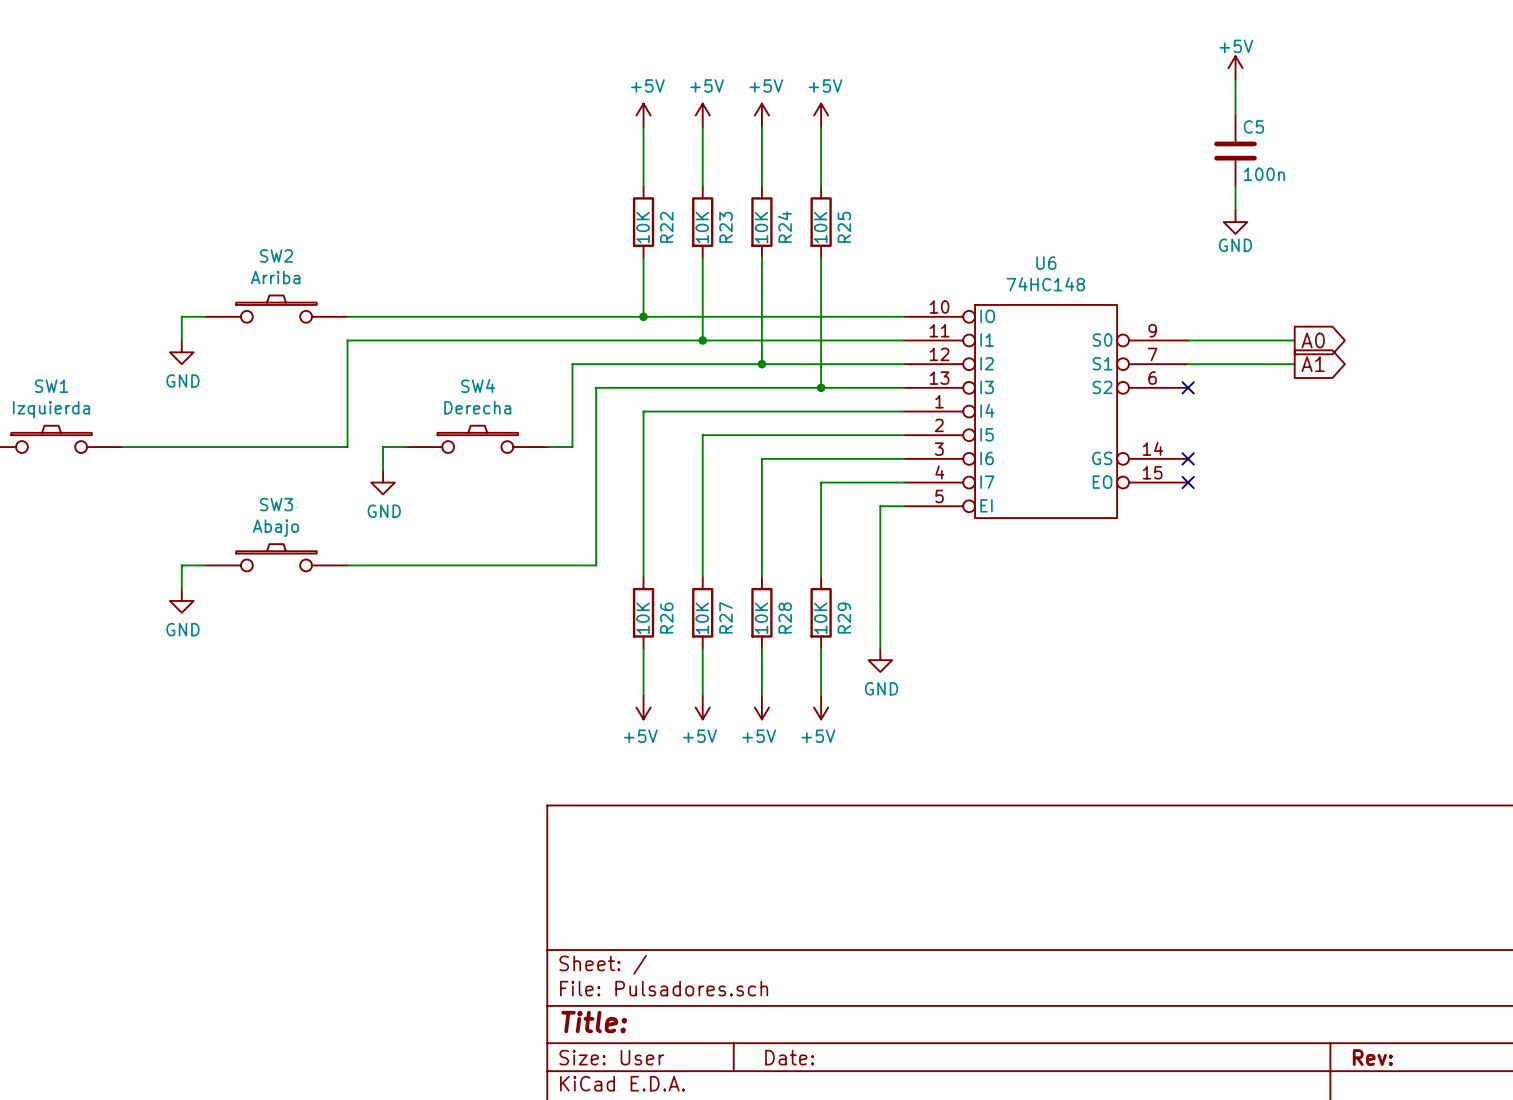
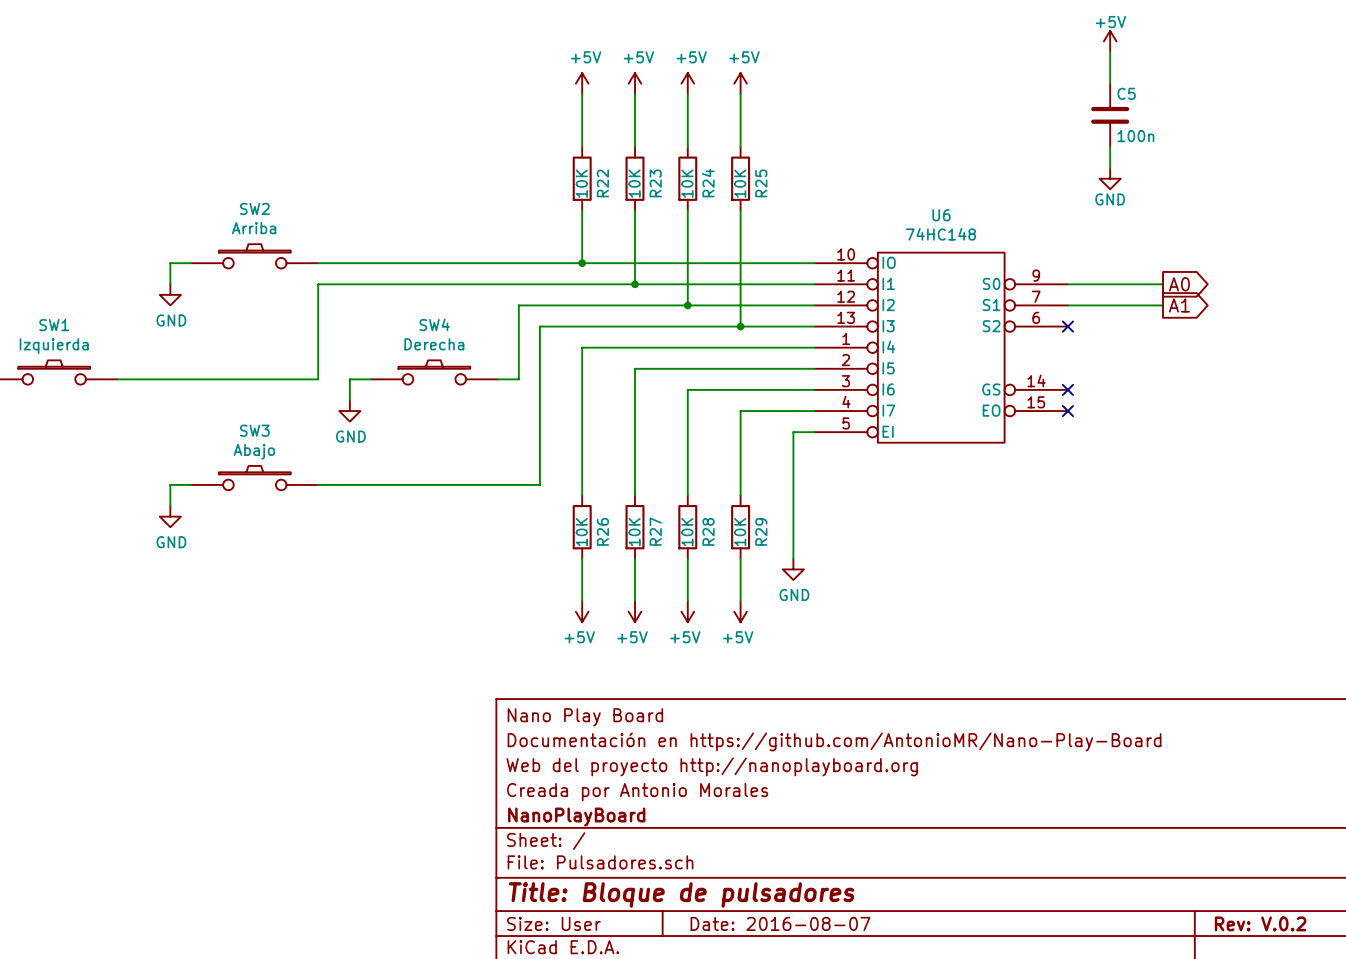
title block: none -> Nano Play Board (585, 717)
title block: none -> Documentación en https://github.com/AntonioMR/Nano-Play-Board (834, 741)
title block: none -> Web del proyecto http://nanoplayboard.org (712, 766)
title block: none -> Creada por Antonio Morales (637, 792)
title block: none -> NanoPlayBoard (576, 817)
title block: Title: (594, 1022) -> Title: Bloque de pulsadores (681, 894)
title block: Date: (789, 1057) -> Date: 2016-08-07 (780, 923)
title block: Rev: (1372, 1057) -> Rev: V.0.2 (1260, 923)

